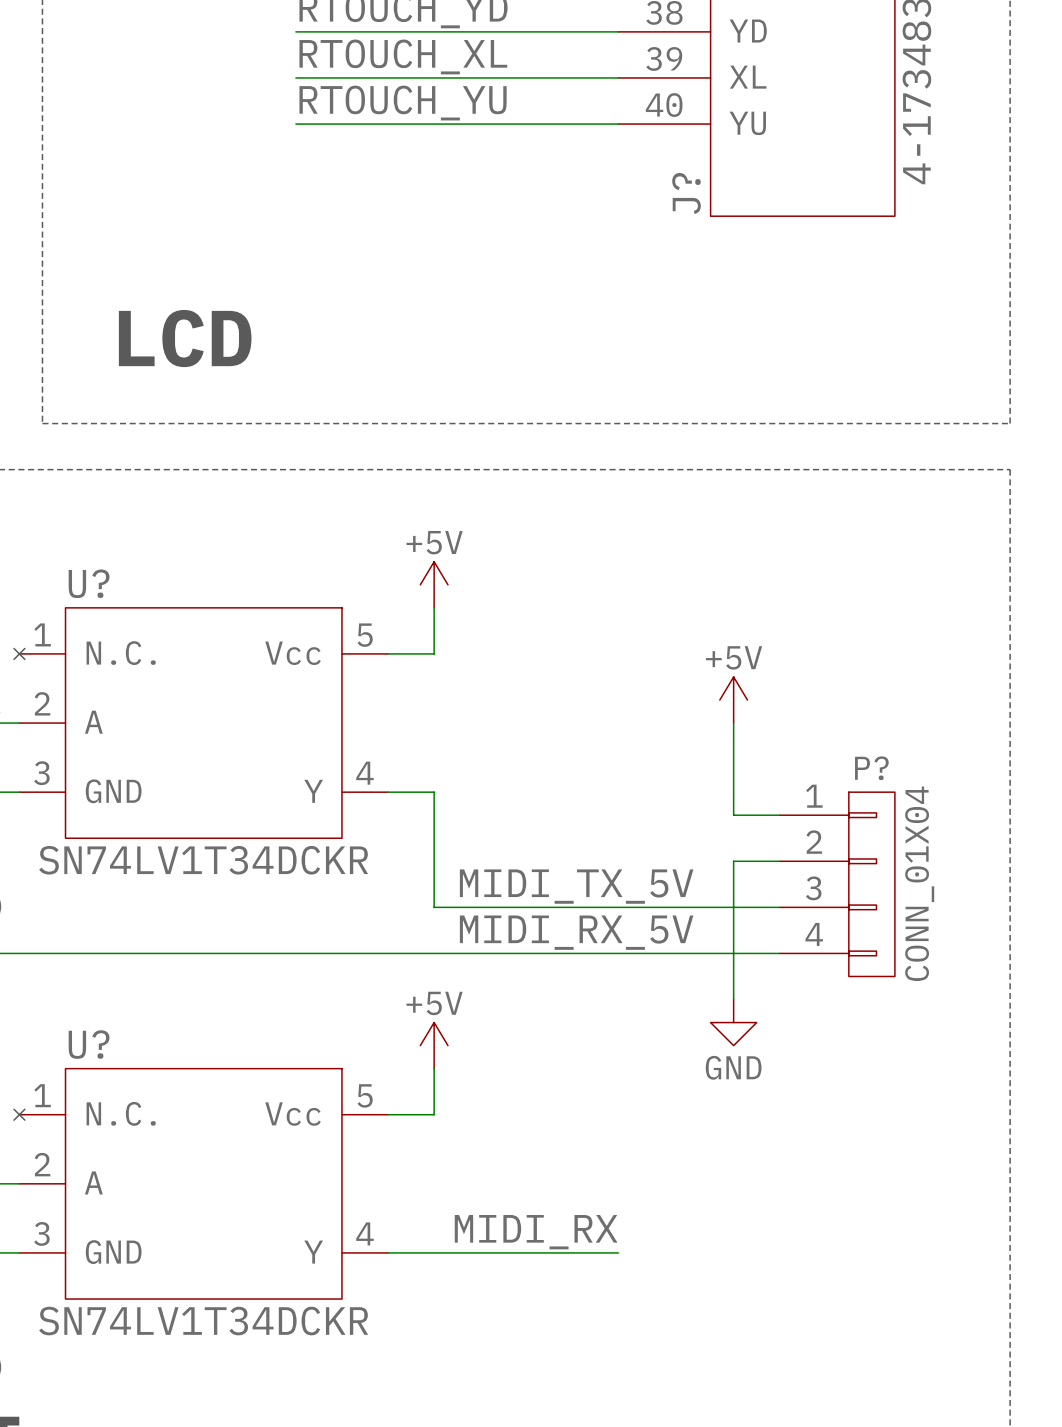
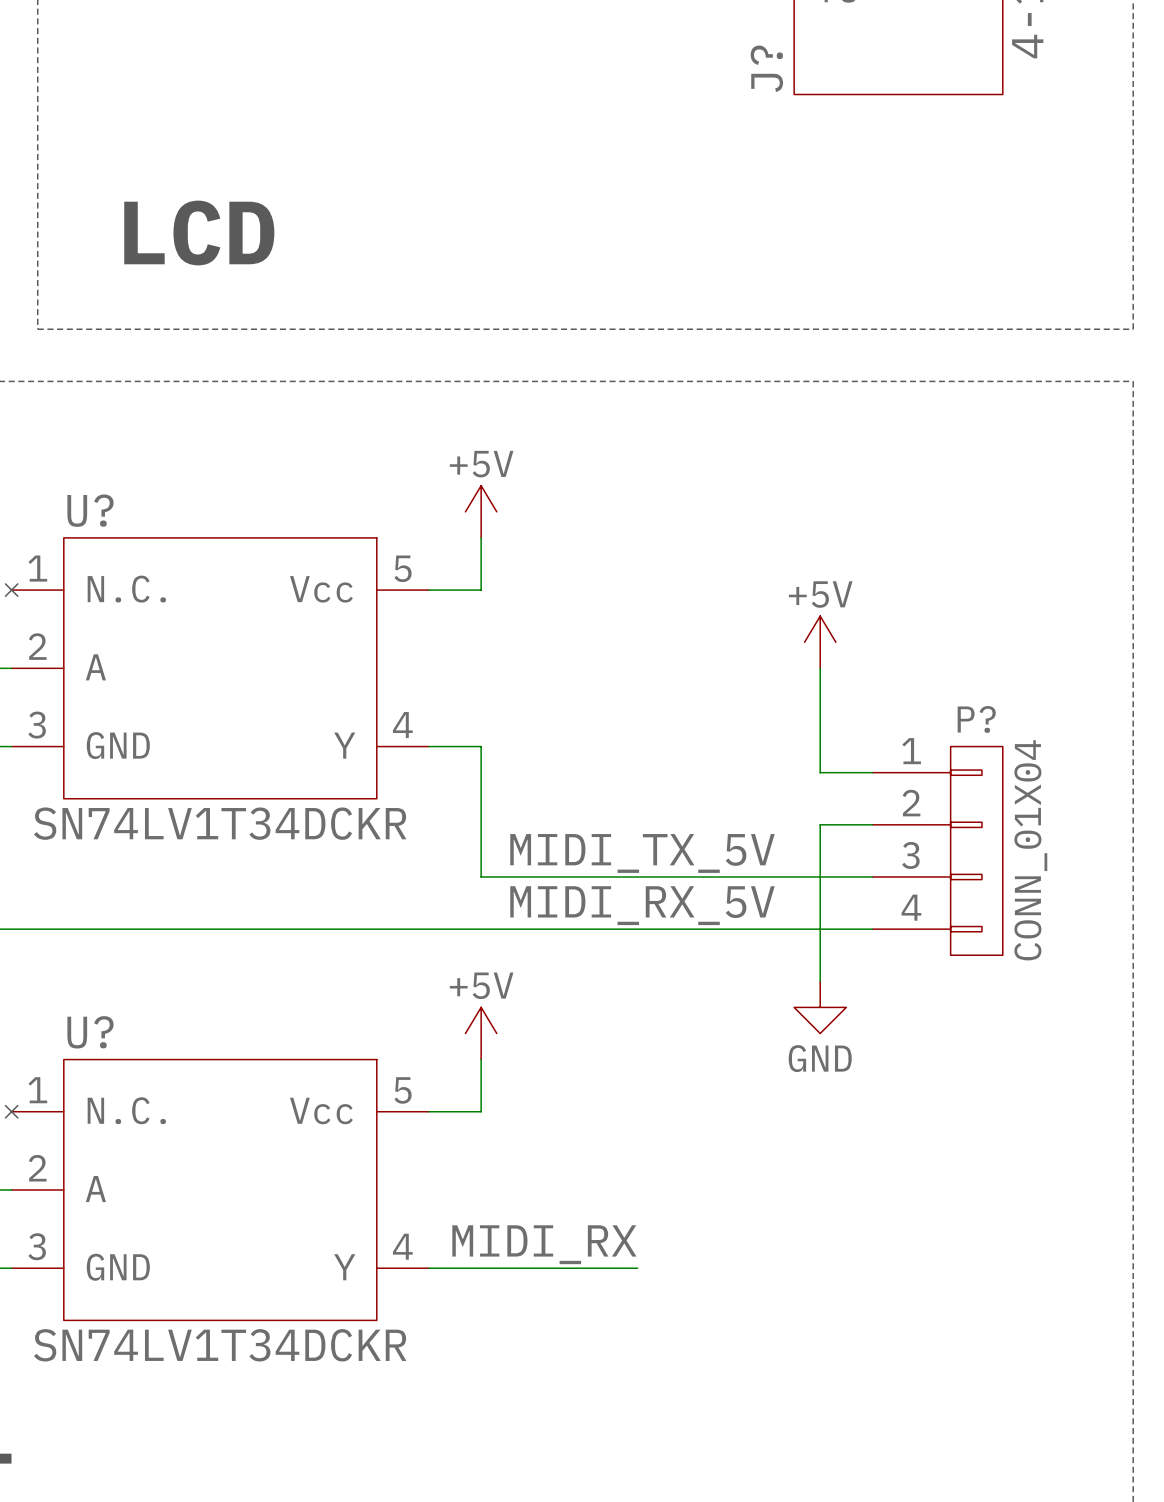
label position: MIDI_RX (536, 1232) -> MIDI_RX (544, 1244)
wire: (572, 1252) (618, 1252) -> none

